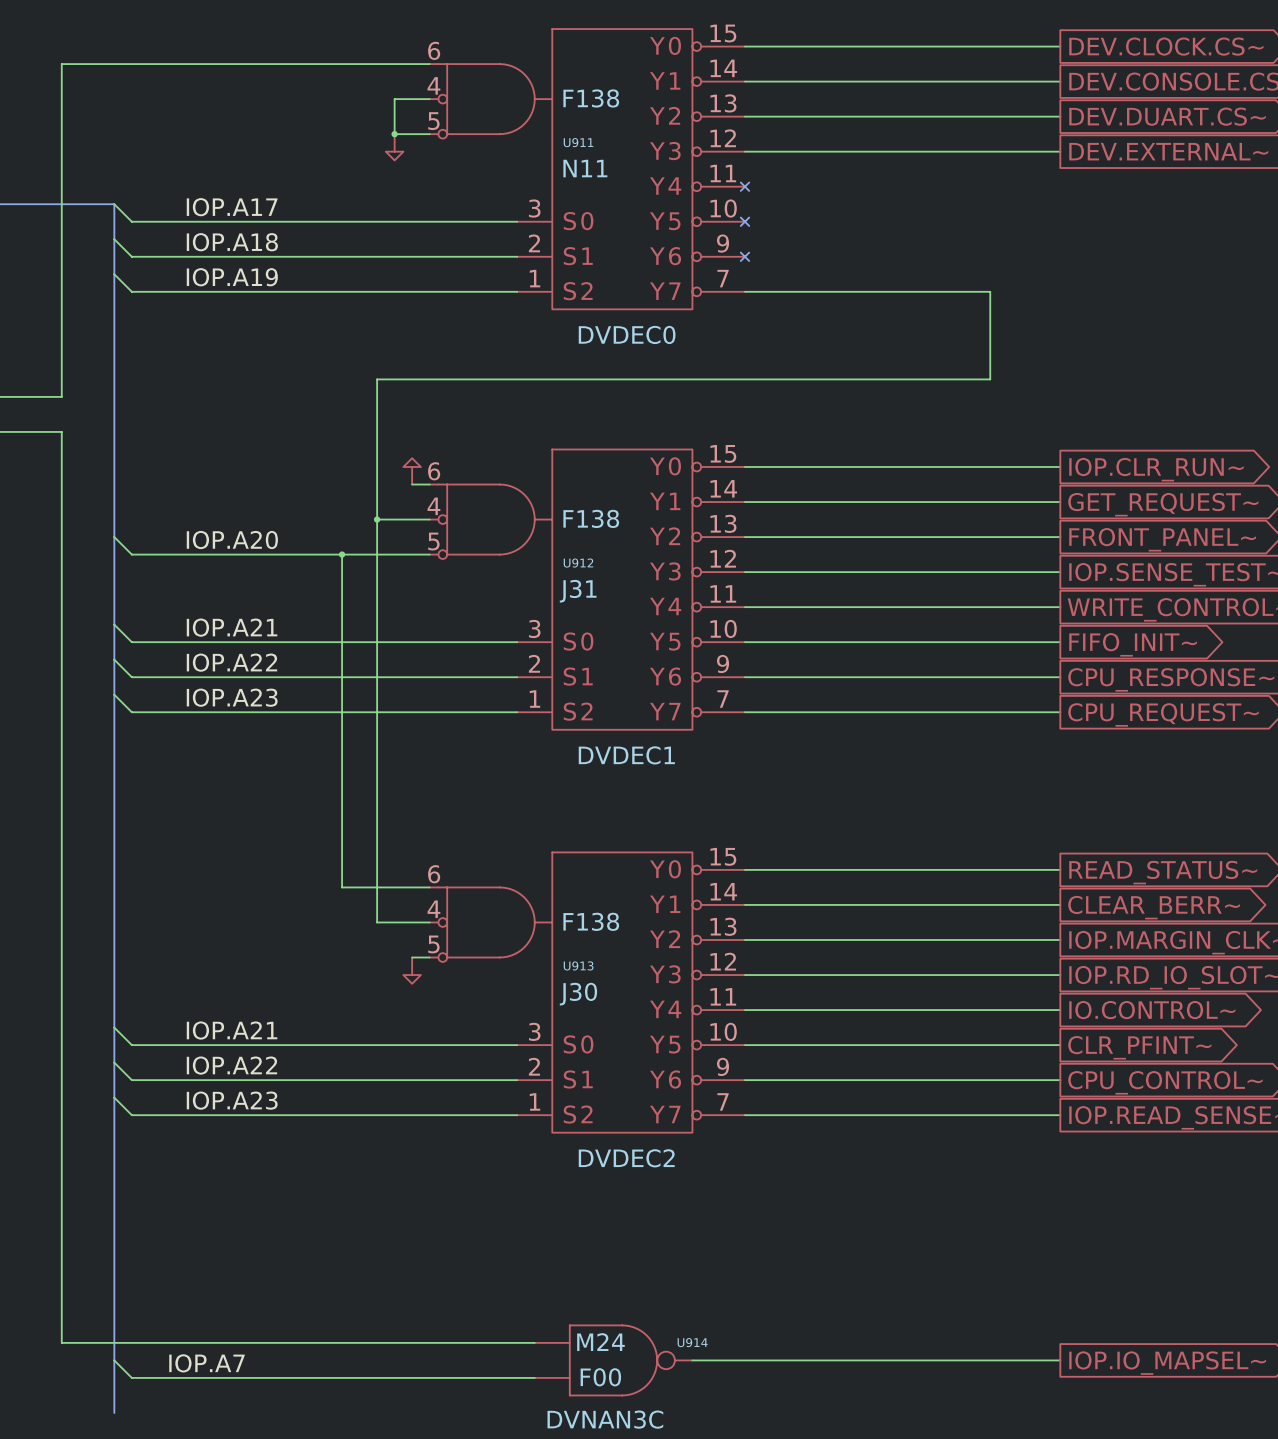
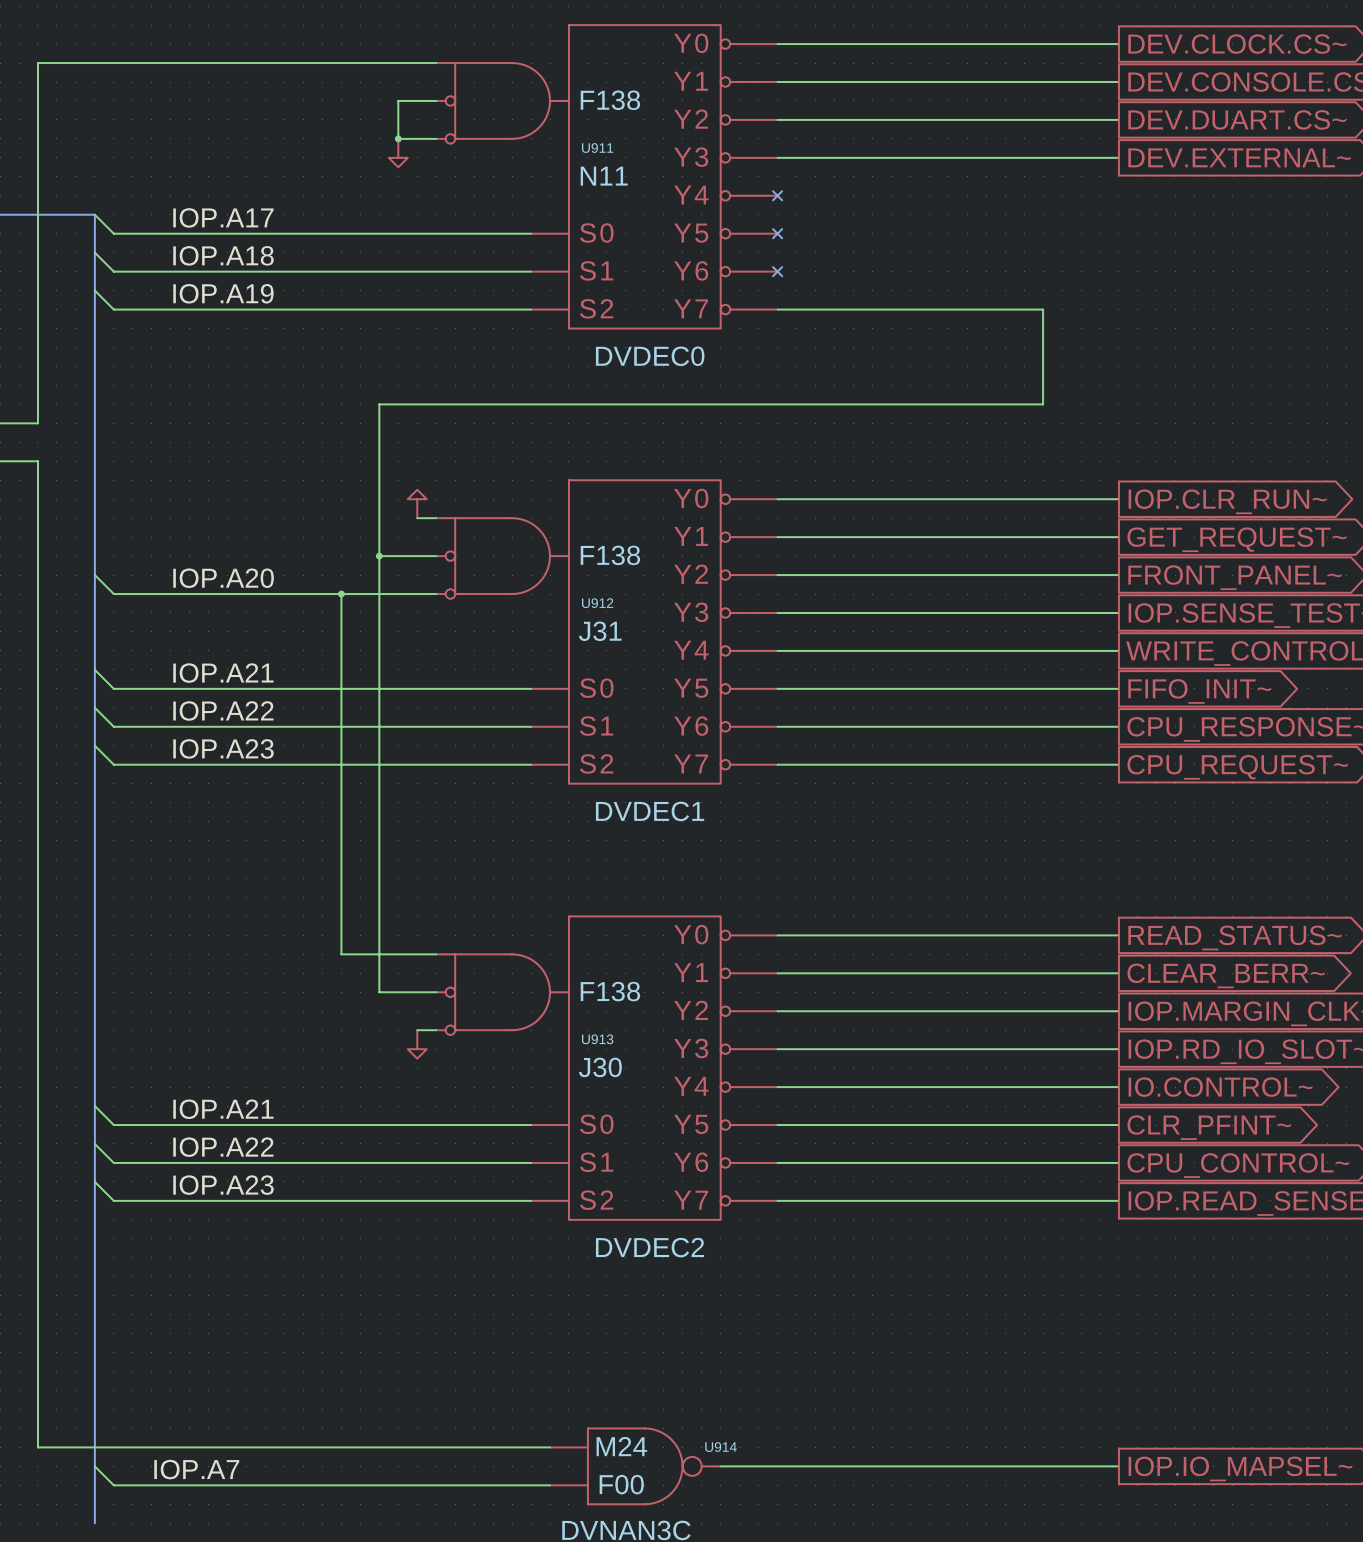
U911 symbol: [429, 28, 745, 310] -> [436, 24, 778, 330]
U912 symbol: [429, 448, 745, 731] -> [436, 479, 778, 785]
U913 symbol: [429, 851, 745, 1134] -> [436, 915, 778, 1221]

